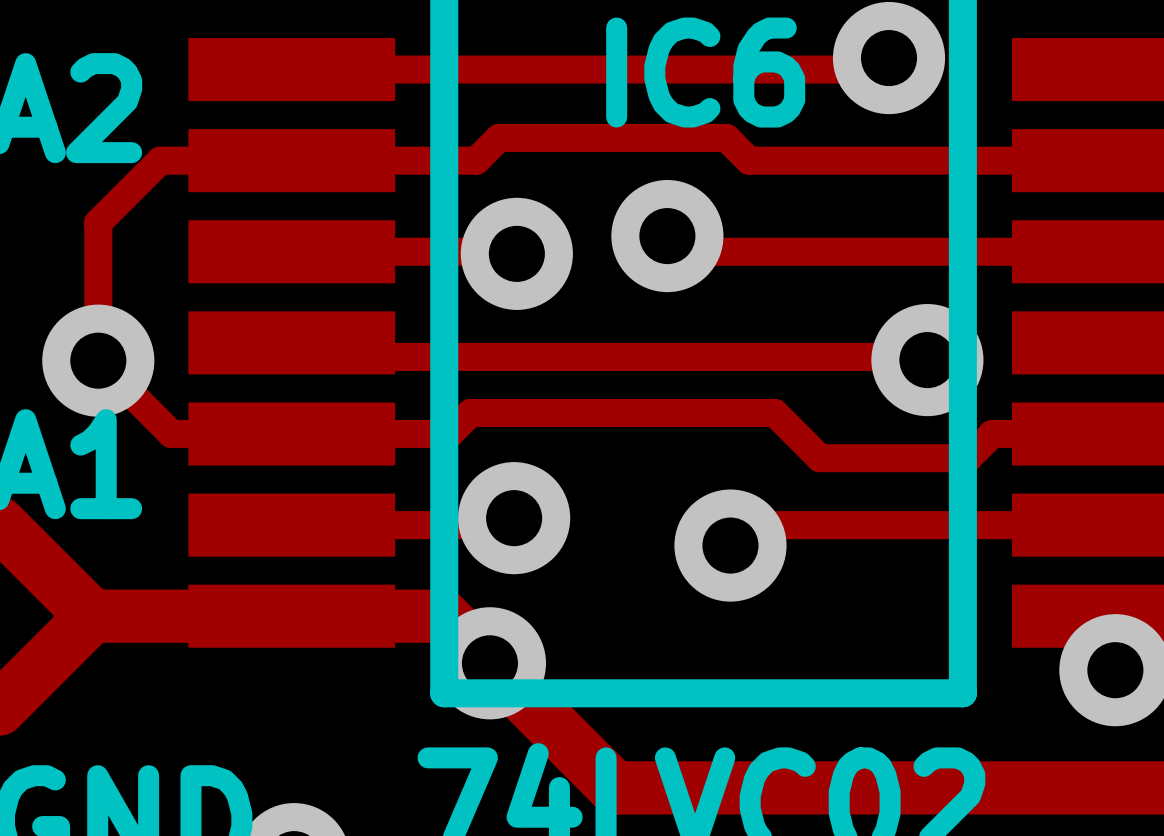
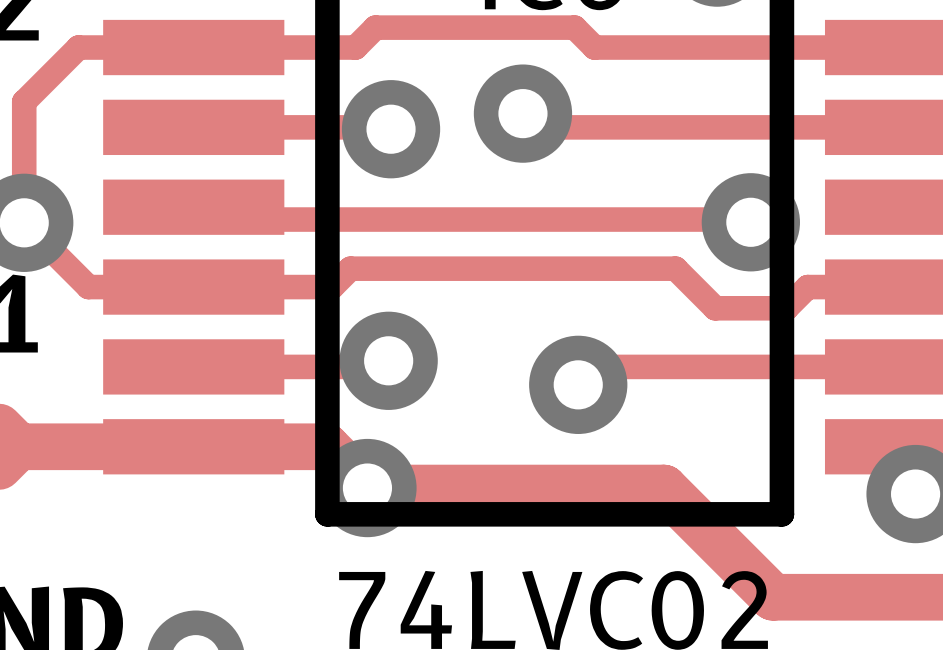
track: (774, 413) (819, 458) (886, 458) -> (617, 268) (675, 268) (715, 308)
track: (489, 663) (614, 787) (952, 787) -> (367, 488) (663, 488) (773, 597)

